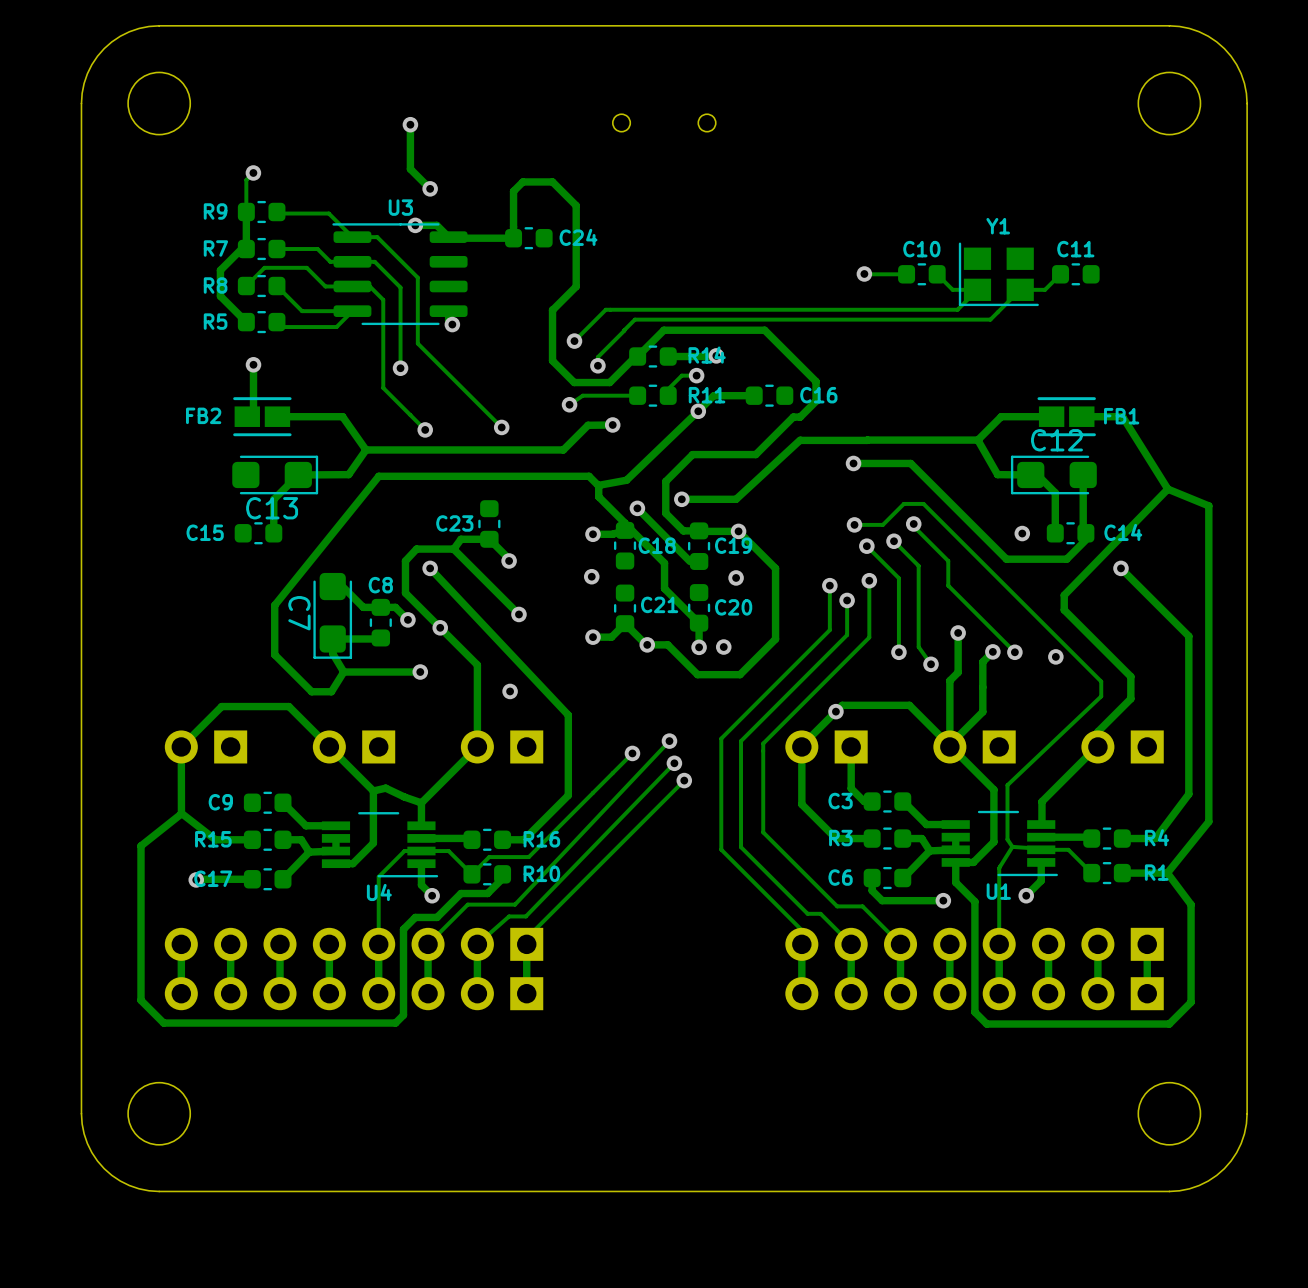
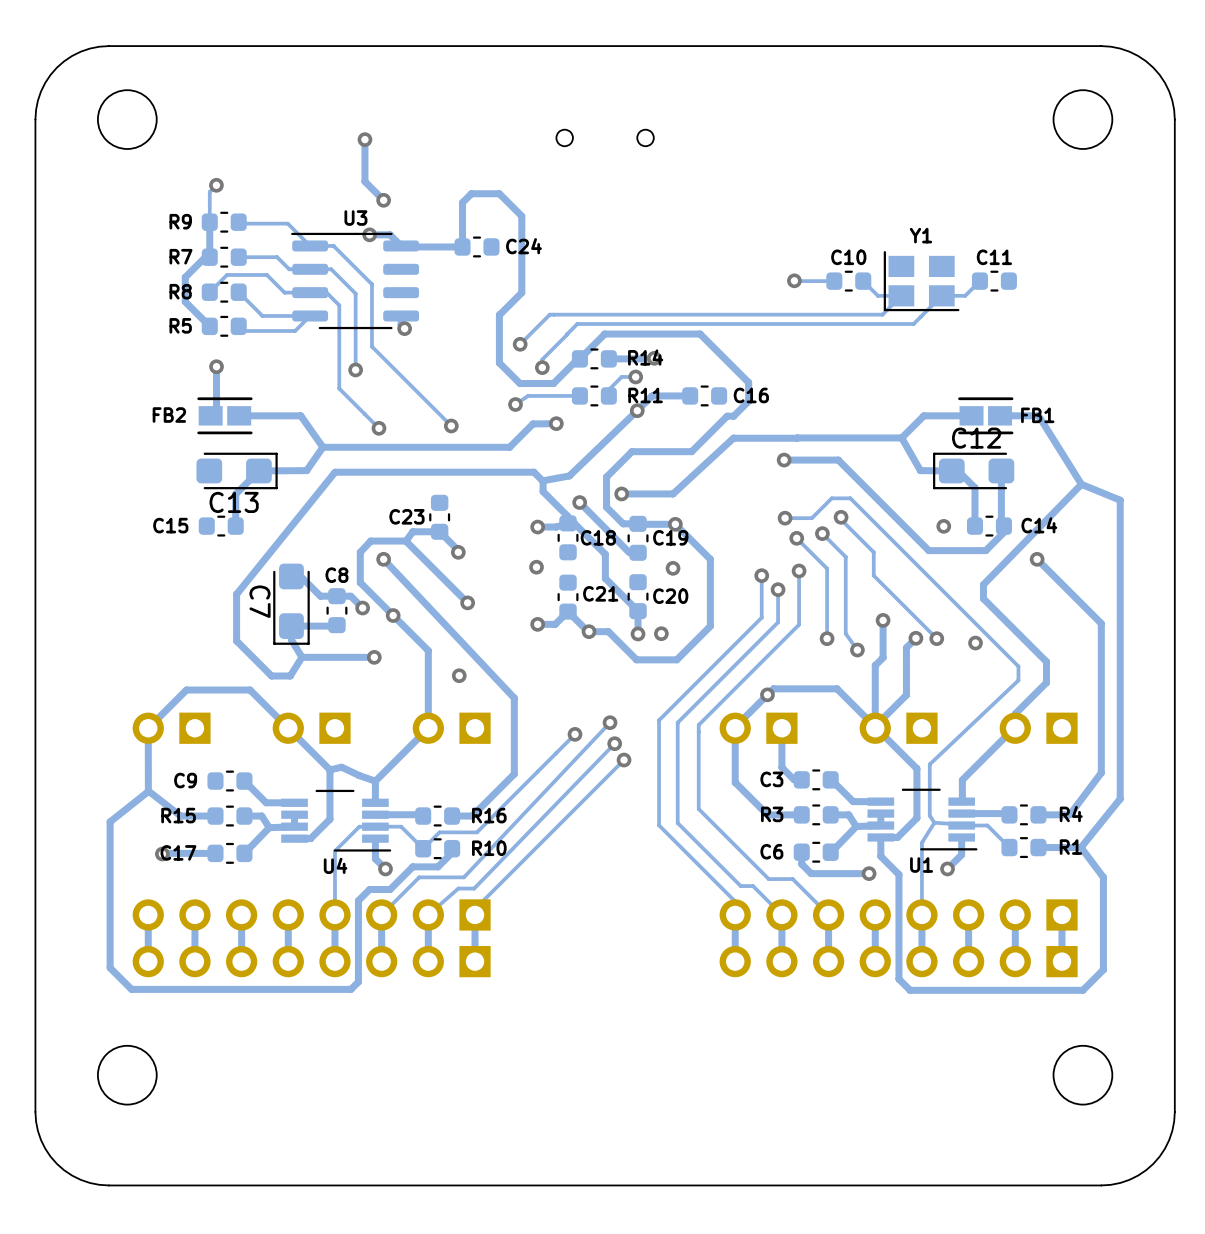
board edge: (1169, 25) (1199, 31) (1224, 48) (1241, 73) (1247, 103) (1246, 1123) (1236, 1152) (1216, 1175) (1189, 1188) (1169, 1191) (159, 1191) (129, 1185) (111, 1175) (97, 1161) (87, 1143) (81, 1113) (81, 103) (87, 73) (104, 48) (129, 31) (159, 25) -> (1082, 46) (1120, 48) (1146, 61) (1159, 74) (1169, 91) (1174, 119) (1174, 1121) (1164, 1148) (1146, 1170) (1129, 1179) (1101, 1185) (108, 1185) (89, 1182) (72, 1175) (50, 1156) (41, 1140) (35, 1111) (36, 109) (45, 82) (64, 61) (89, 48) (127, 46)

